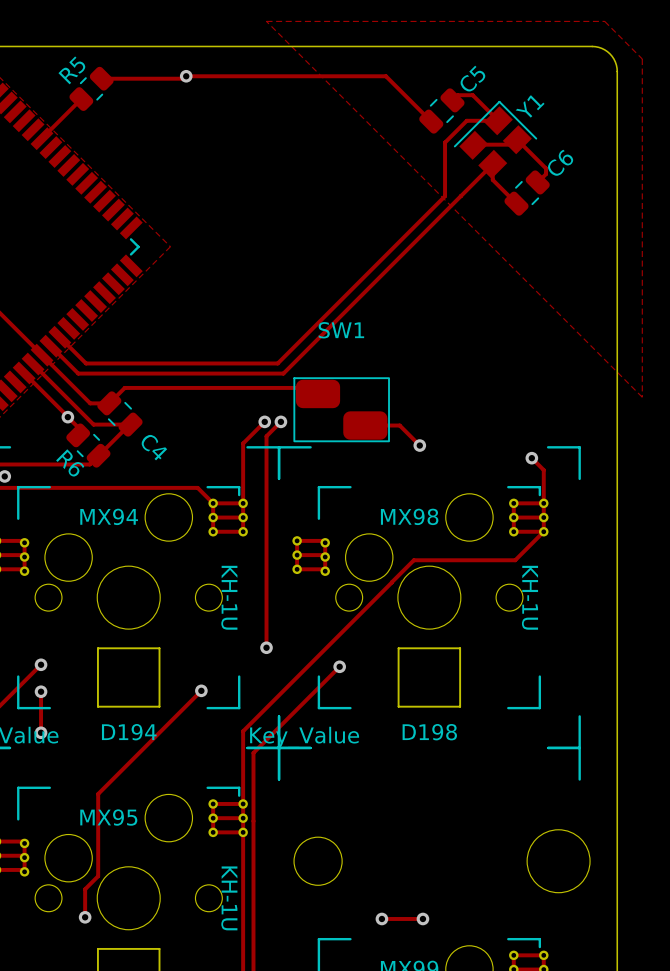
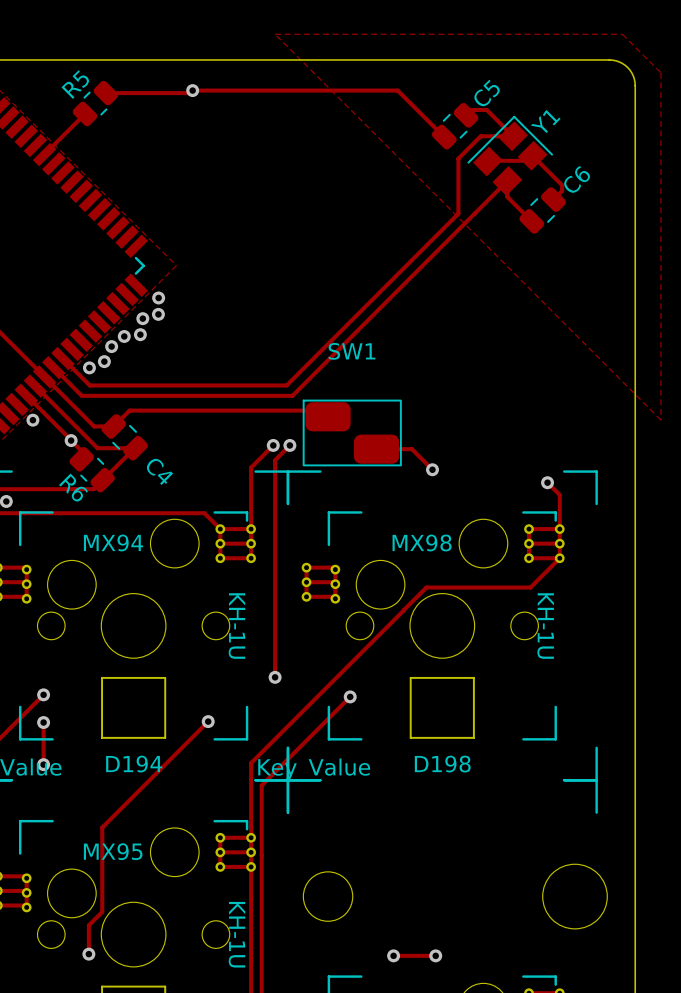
via: none -> (158, 297)
via: none -> (158, 314)
via: none -> (142, 318)
via: none -> (140, 334)
via: none -> (124, 336)
via: none -> (111, 346)
via: none -> (104, 361)
via: none -> (89, 367)
via: none -> (32, 420)

